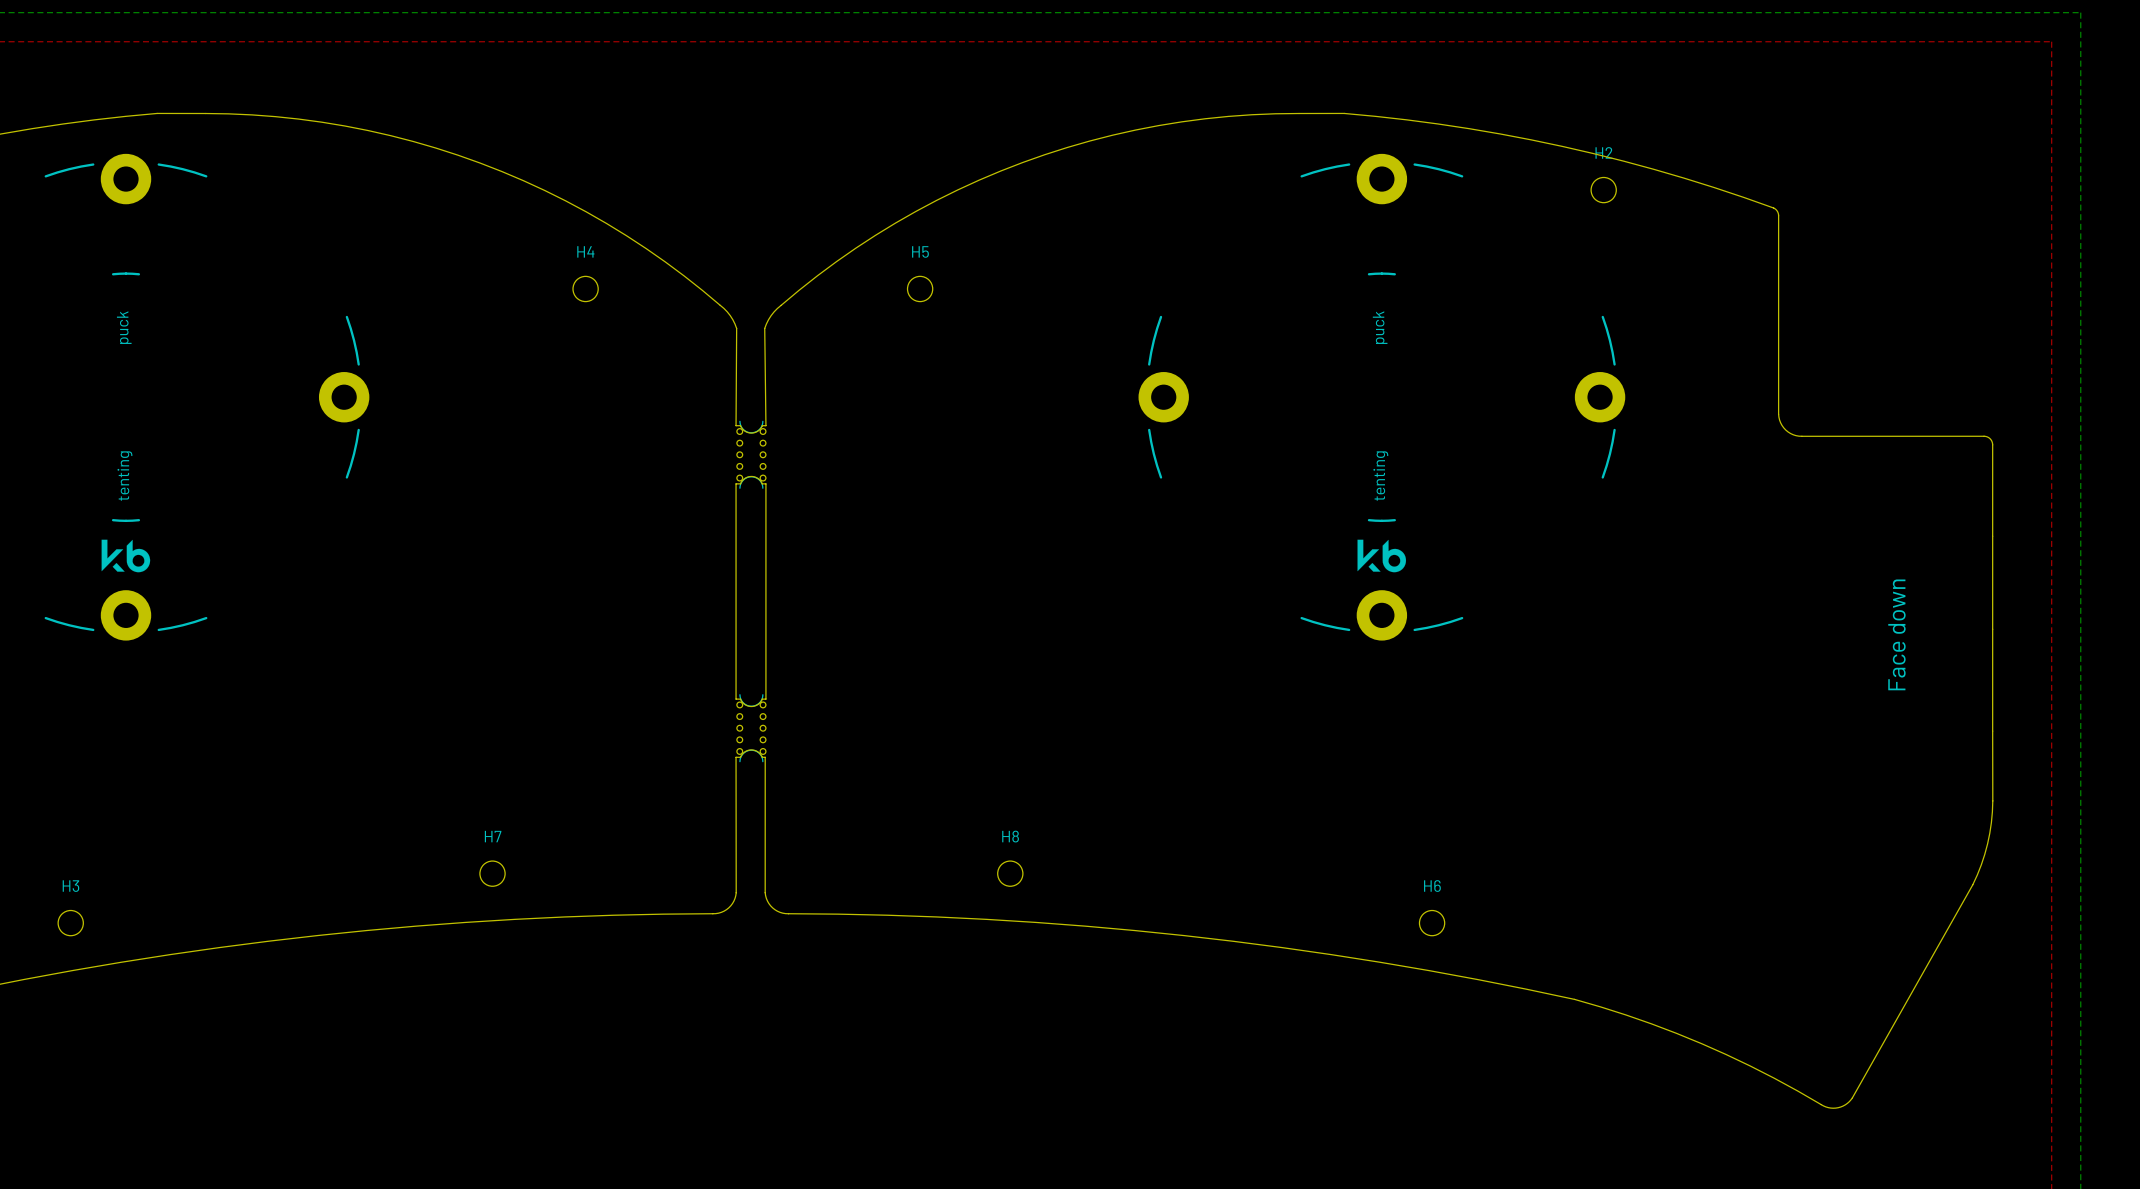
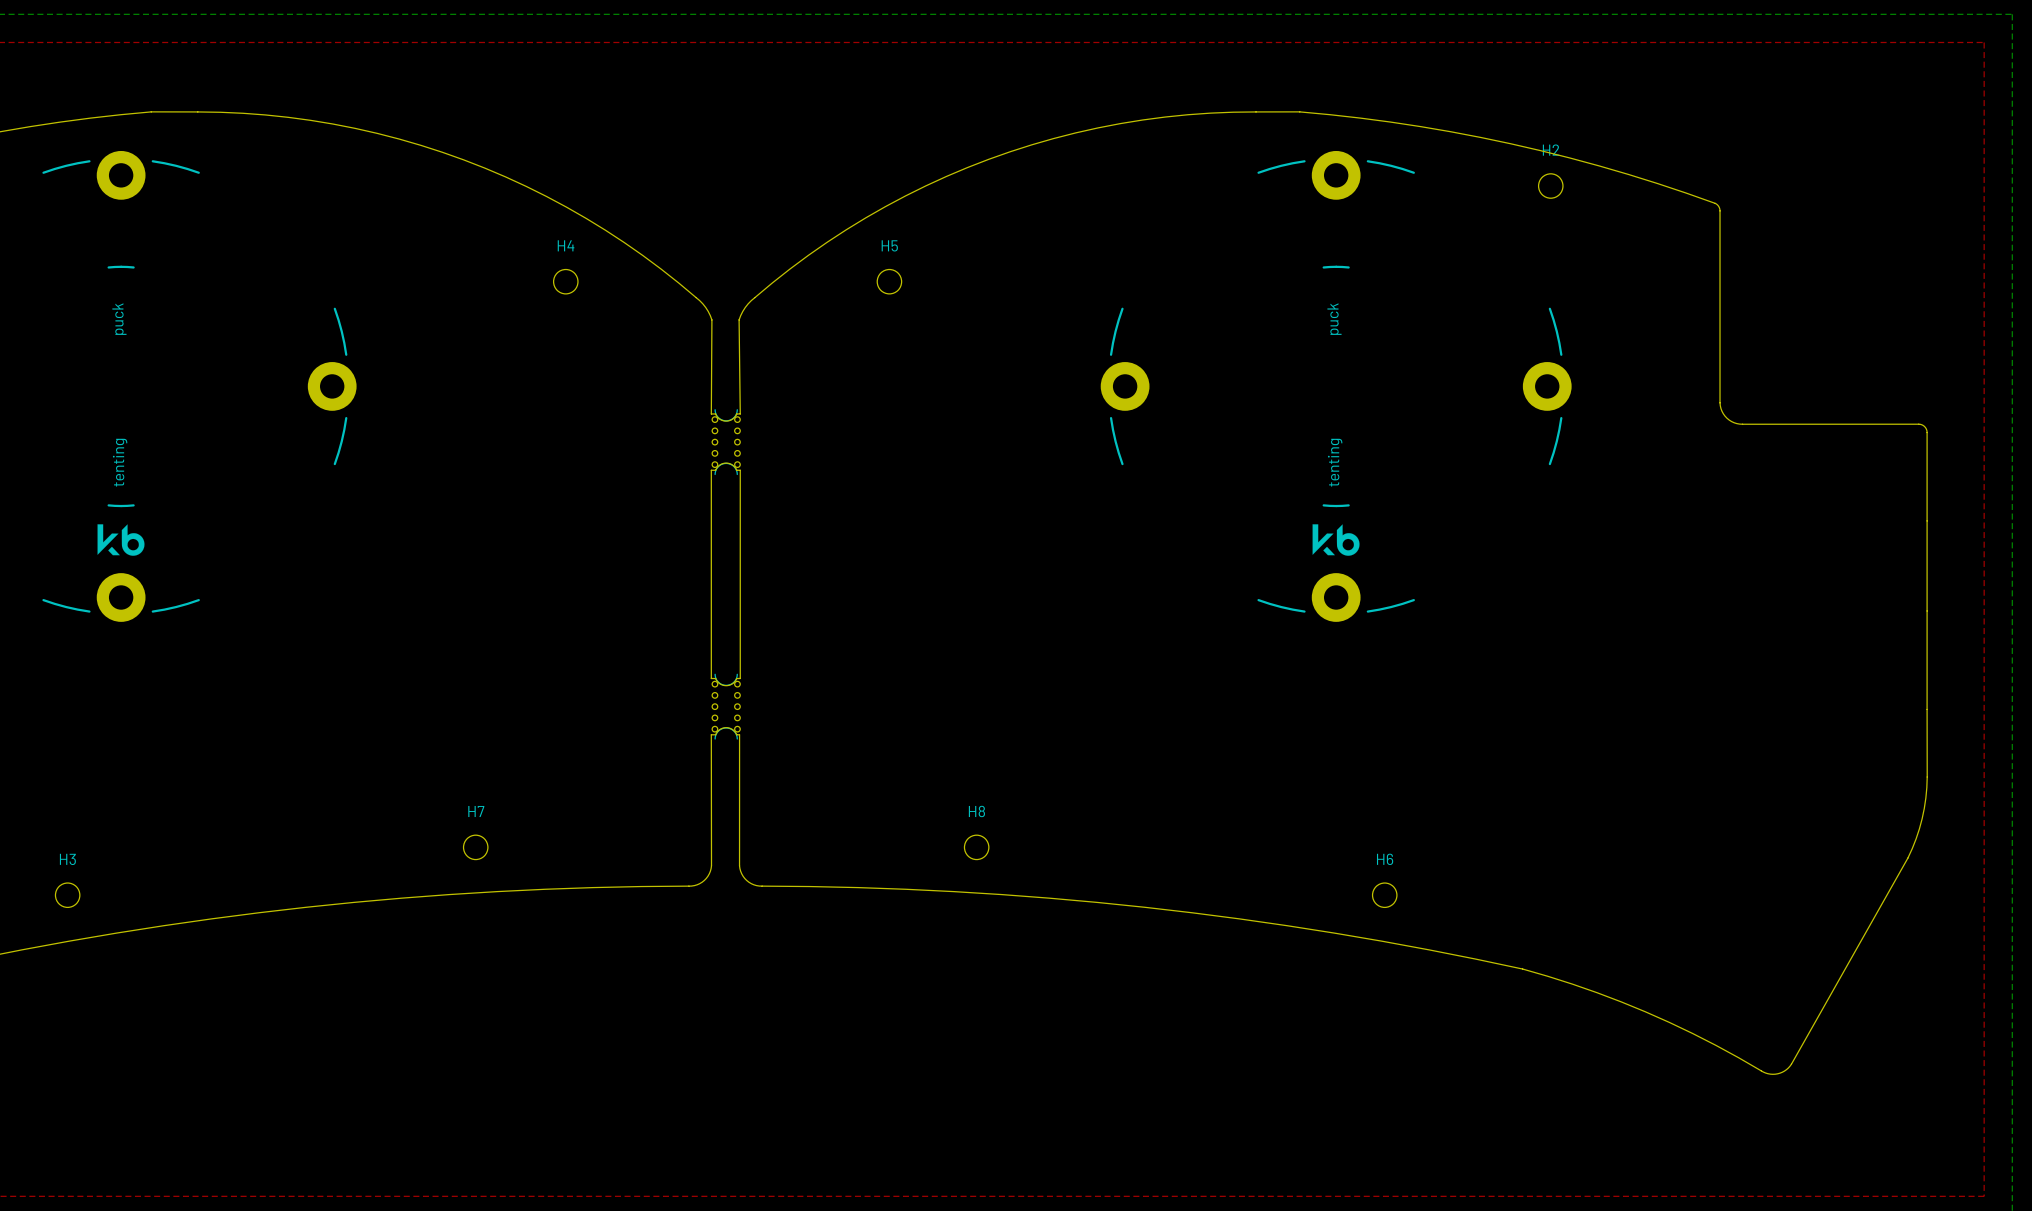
text: Face down (1896, 634) -> none

